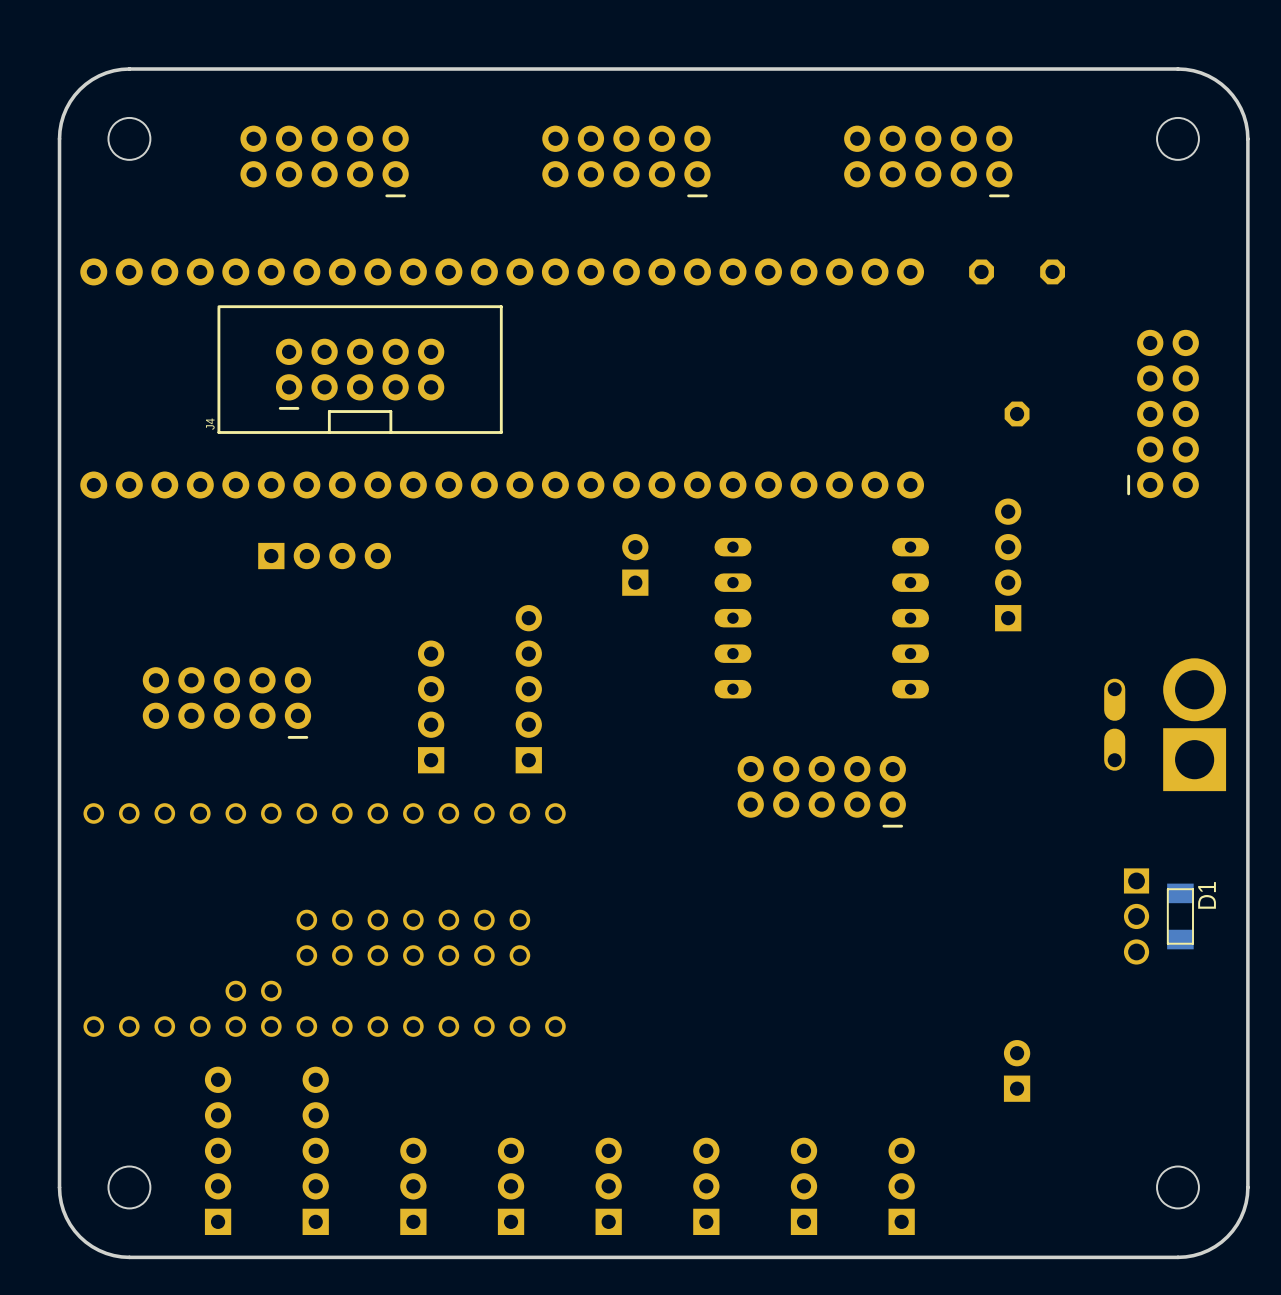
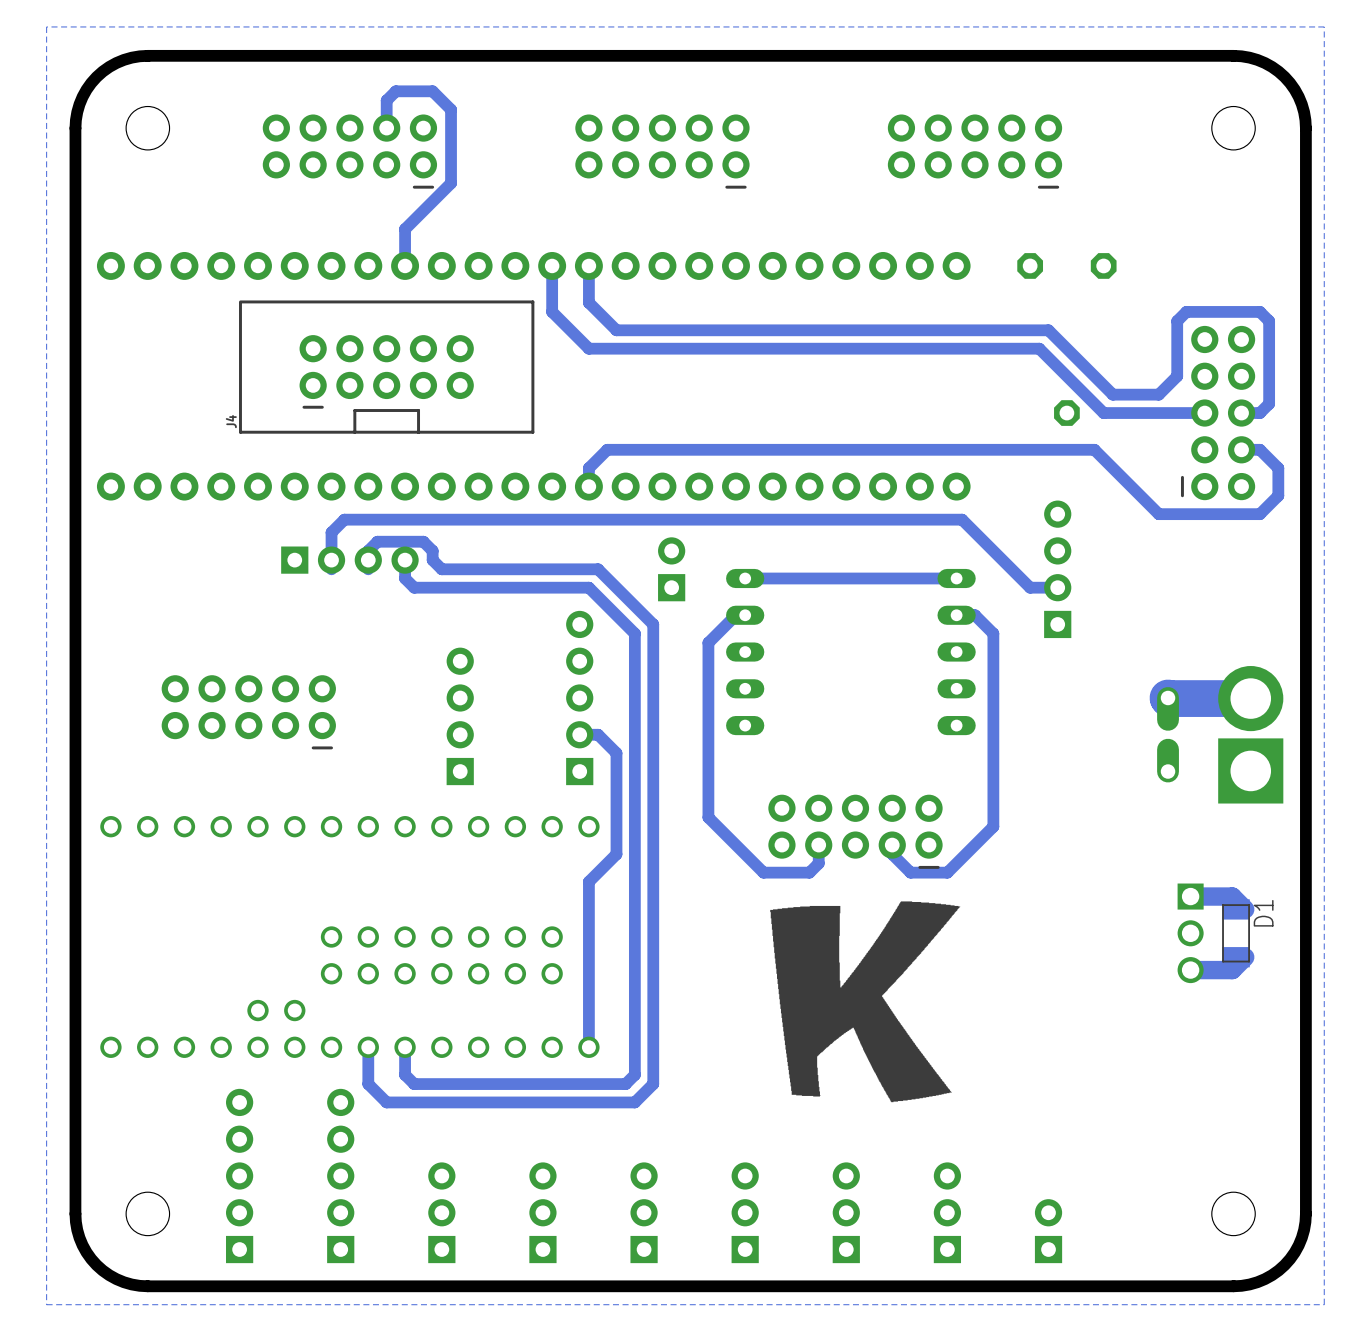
zone outline: none -> (1324, 26) (46, 26) (46, 1304) (1324, 1304) (1324, 26)
board edge width: thin (1177, 69) (129, 69) (106, 72) (92, 79) (80, 89) (70, 101) (63, 115) (59, 138) (59, 1187) (63, 1210) (70, 1224) (80, 1236) (92, 1246) (106, 1253) (129, 1257) (1177, 1257) (1201, 1253) (1215, 1246) (1227, 1236) (1237, 1224) (1243, 1210) (1247, 1187) (1247, 138) (1243, 115) (1237, 101) (1227, 89) (1215, 79) (1201, 72) (1177, 69) -> thick (1233, 55) (147, 55) (123, 59) (109, 66) (96, 77) (86, 89) (79, 104) (75, 128) (75, 1213) (79, 1237) (86, 1252) (96, 1265) (109, 1275) (123, 1282) (147, 1286) (1233, 1286) (1257, 1282) (1272, 1275) (1284, 1265) (1294, 1252) (1301, 1237) (1305, 1213) (1305, 128) (1301, 104) (1294, 89) (1284, 77) (1272, 66) (1257, 59) (1233, 55)
track: none -> (386, 128) (386, 100) (395, 91) (432, 91) (451, 109) (451, 183) (405, 229) (405, 265)
track: none -> (552, 265) (552, 311) (588, 348) (1039, 348) (1103, 413) (1204, 413)
track: none -> (588, 265) (588, 302) (616, 330) (1048, 330) (1112, 394) (1158, 394) (1177, 376) (1177, 321) (1186, 311) (1259, 311) (1269, 321) (1269, 403) (1259, 413) (1241, 413)
track: none -> (1241, 449) (1259, 449) (1278, 468) (1278, 495) (1259, 514) (1158, 514) (1094, 449) (607, 449) (588, 468) (588, 486)
track: none -> (331, 569) (331, 532) (344, 519) (962, 519) (1030, 587) (1057, 587)
track: none -> (368, 569) (368, 550) (377, 541) (423, 541) (432, 550) (432, 560) (441, 569) (598, 569) (653, 624) (653, 1084) (634, 1102) (386, 1102) (368, 1084) (368, 1047)
track: none -> (405, 569) (405, 578) (414, 587) (588, 587) (634, 633) (634, 1074) (625, 1084) (414, 1084) (405, 1074) (405, 1047)
track: none -> (956, 578) (745, 578)
track: none -> (745, 615) (735, 615) (708, 642) (708, 817) (763, 872) (809, 872) (818, 863) (818, 845)
track: none -> (956, 615) (974, 615) (993, 633) (993, 826) (947, 872) (910, 872) (892, 854) (892, 845)
part position: (732, 618) -> (745, 652)
part position: (910, 618) -> (956, 652)
part position: (528, 689) -> (579, 697)
track: none -> (1168, 697) (1250, 698)
track: none -> (579, 734) (598, 734) (616, 753) (616, 854) (588, 881) (588, 1047)
part position: (821, 791) -> (855, 831)
track: none -> (1190, 896) (1232, 896) (1245, 909)
drawing: none -> [770, 901, 961, 1103]
track: none -> (1245, 957) (1232, 970) (1190, 970)
part position: (1017, 1070) -> (1048, 1231)

